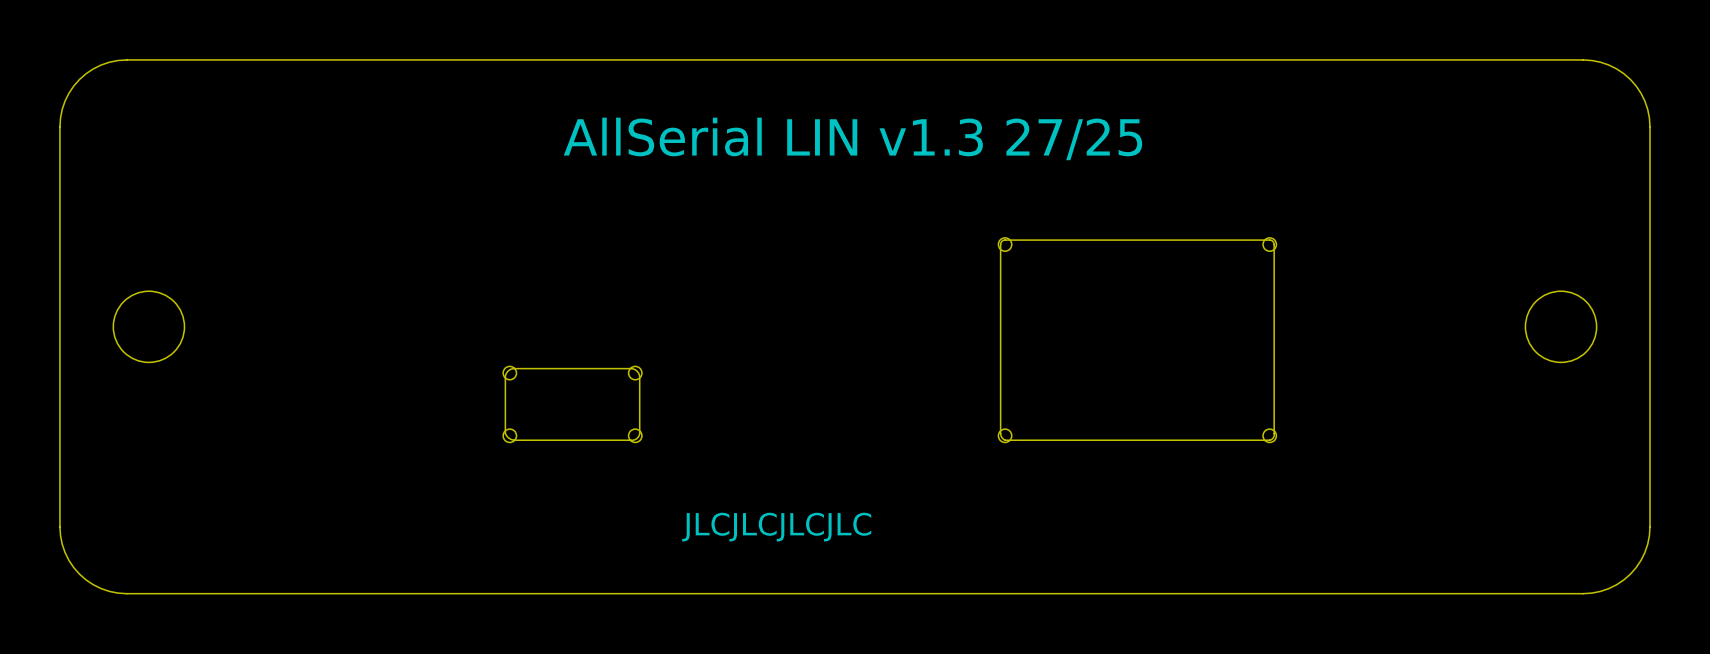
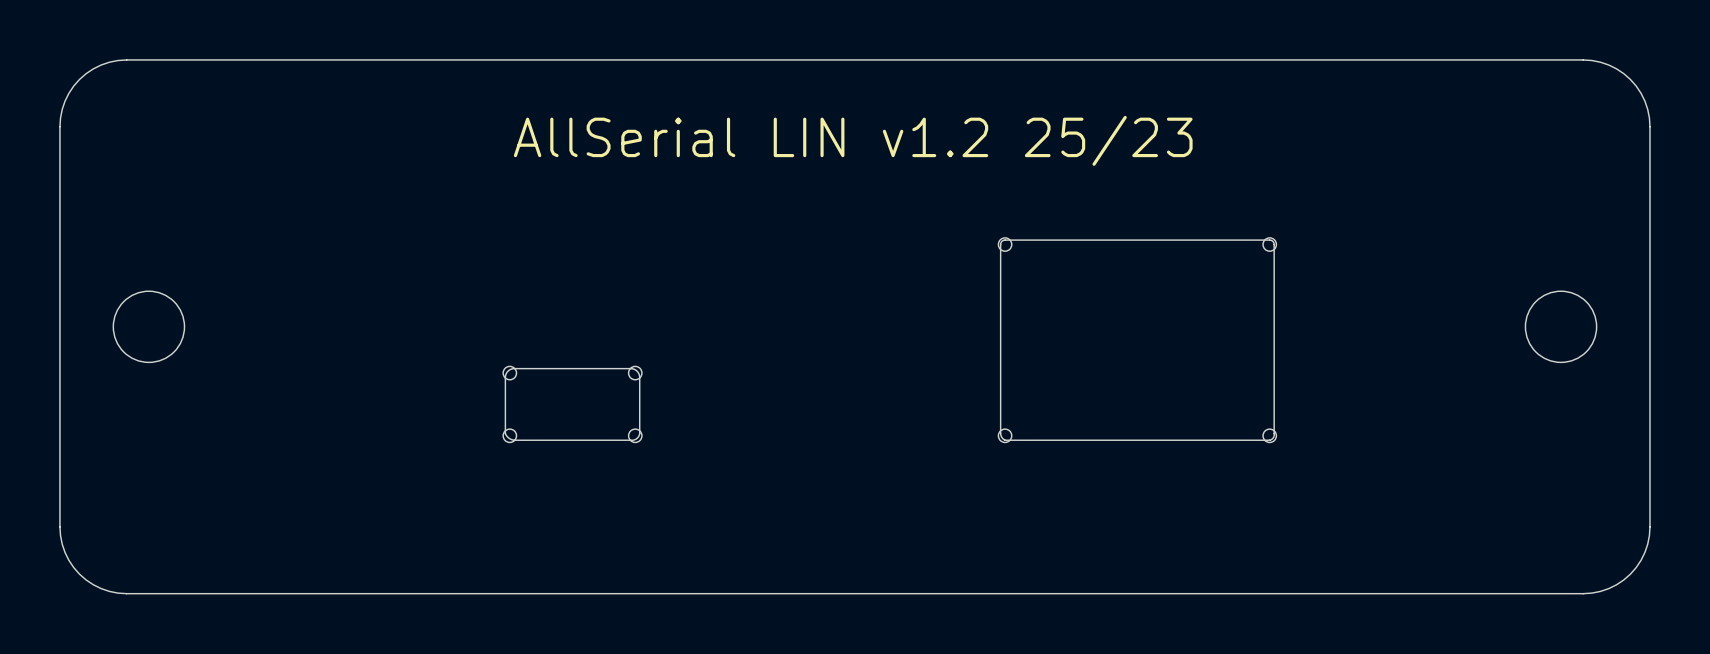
text: AllSerial LIN v1.3 27/25 (852, 138) -> AllSerial LIN v1.2 25/23 (853, 140)
text: JLCJLCJLCJLC (776, 527) -> none

